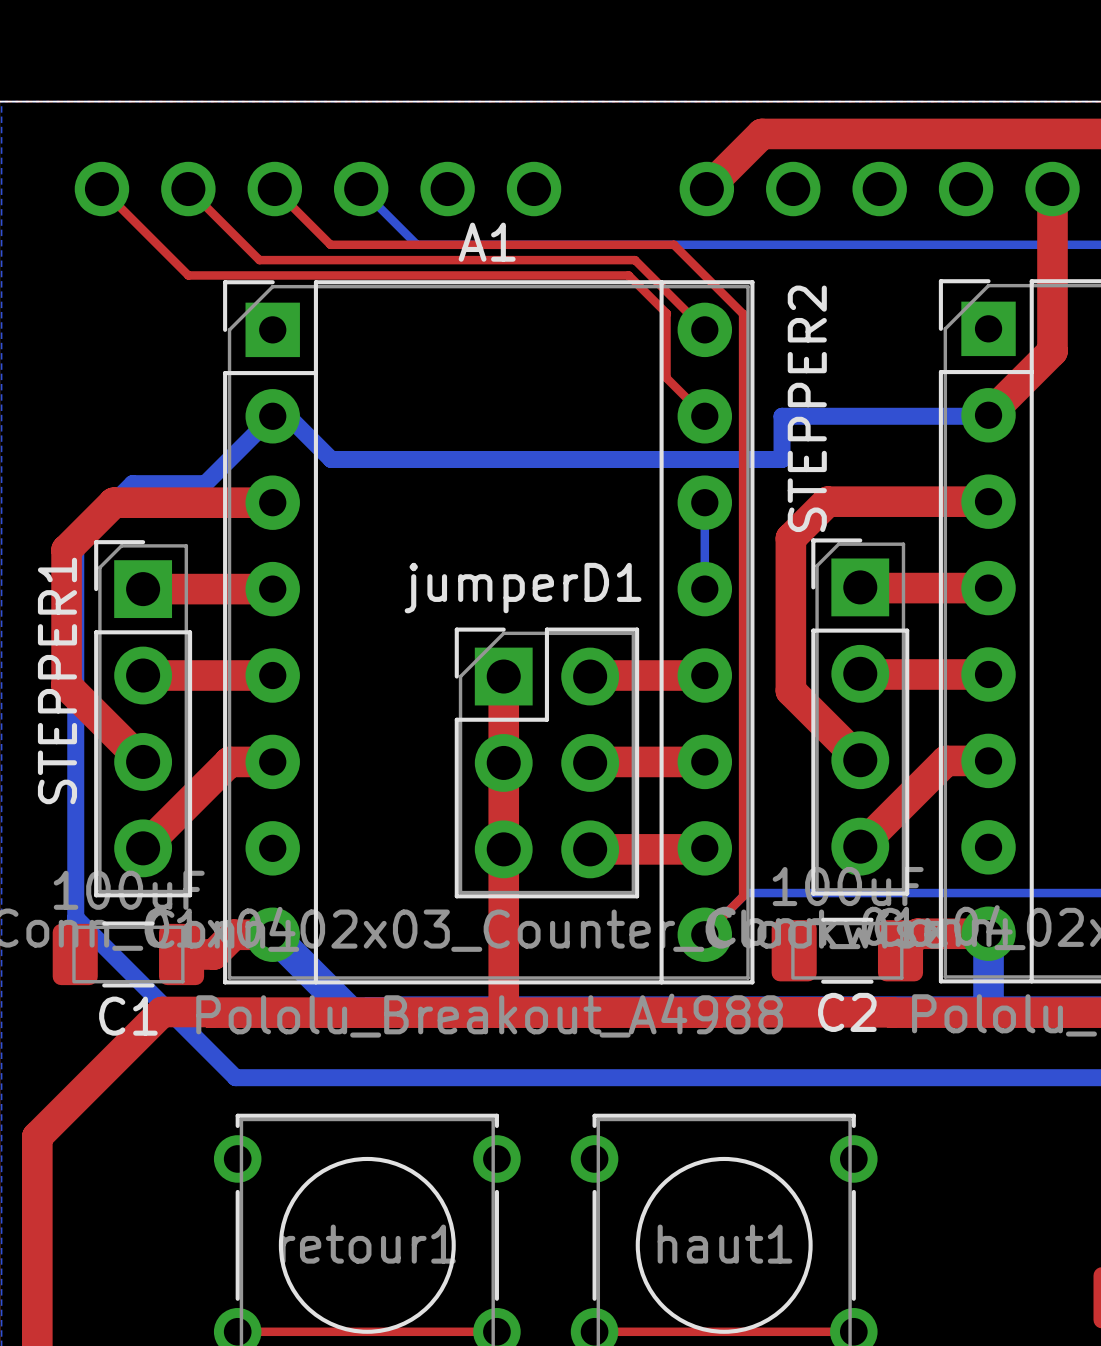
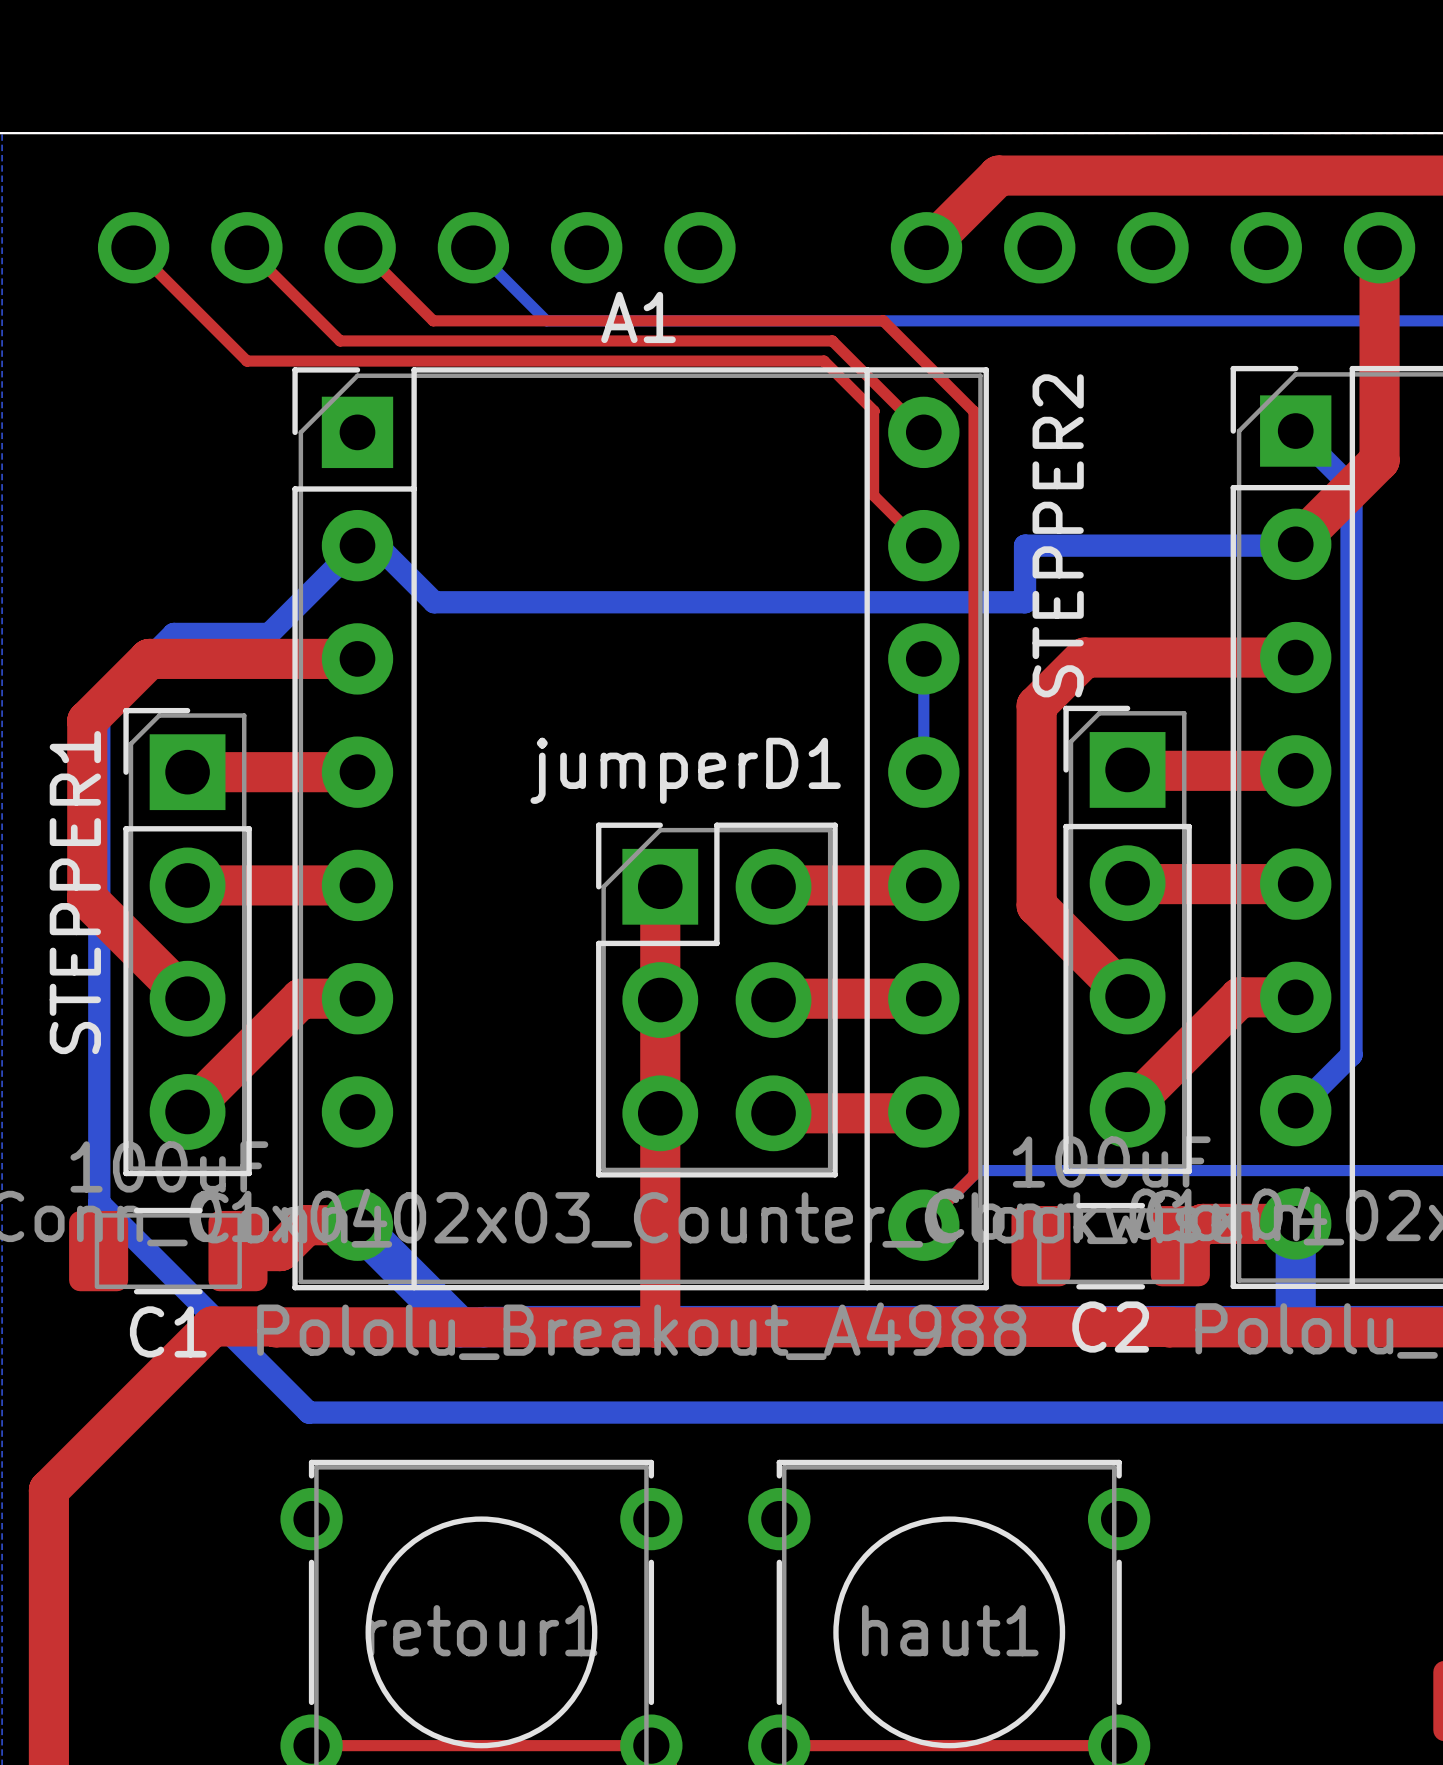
bottom track: none -> (1295, 431) (1351, 486) (1351, 1054) (1295, 1110)

